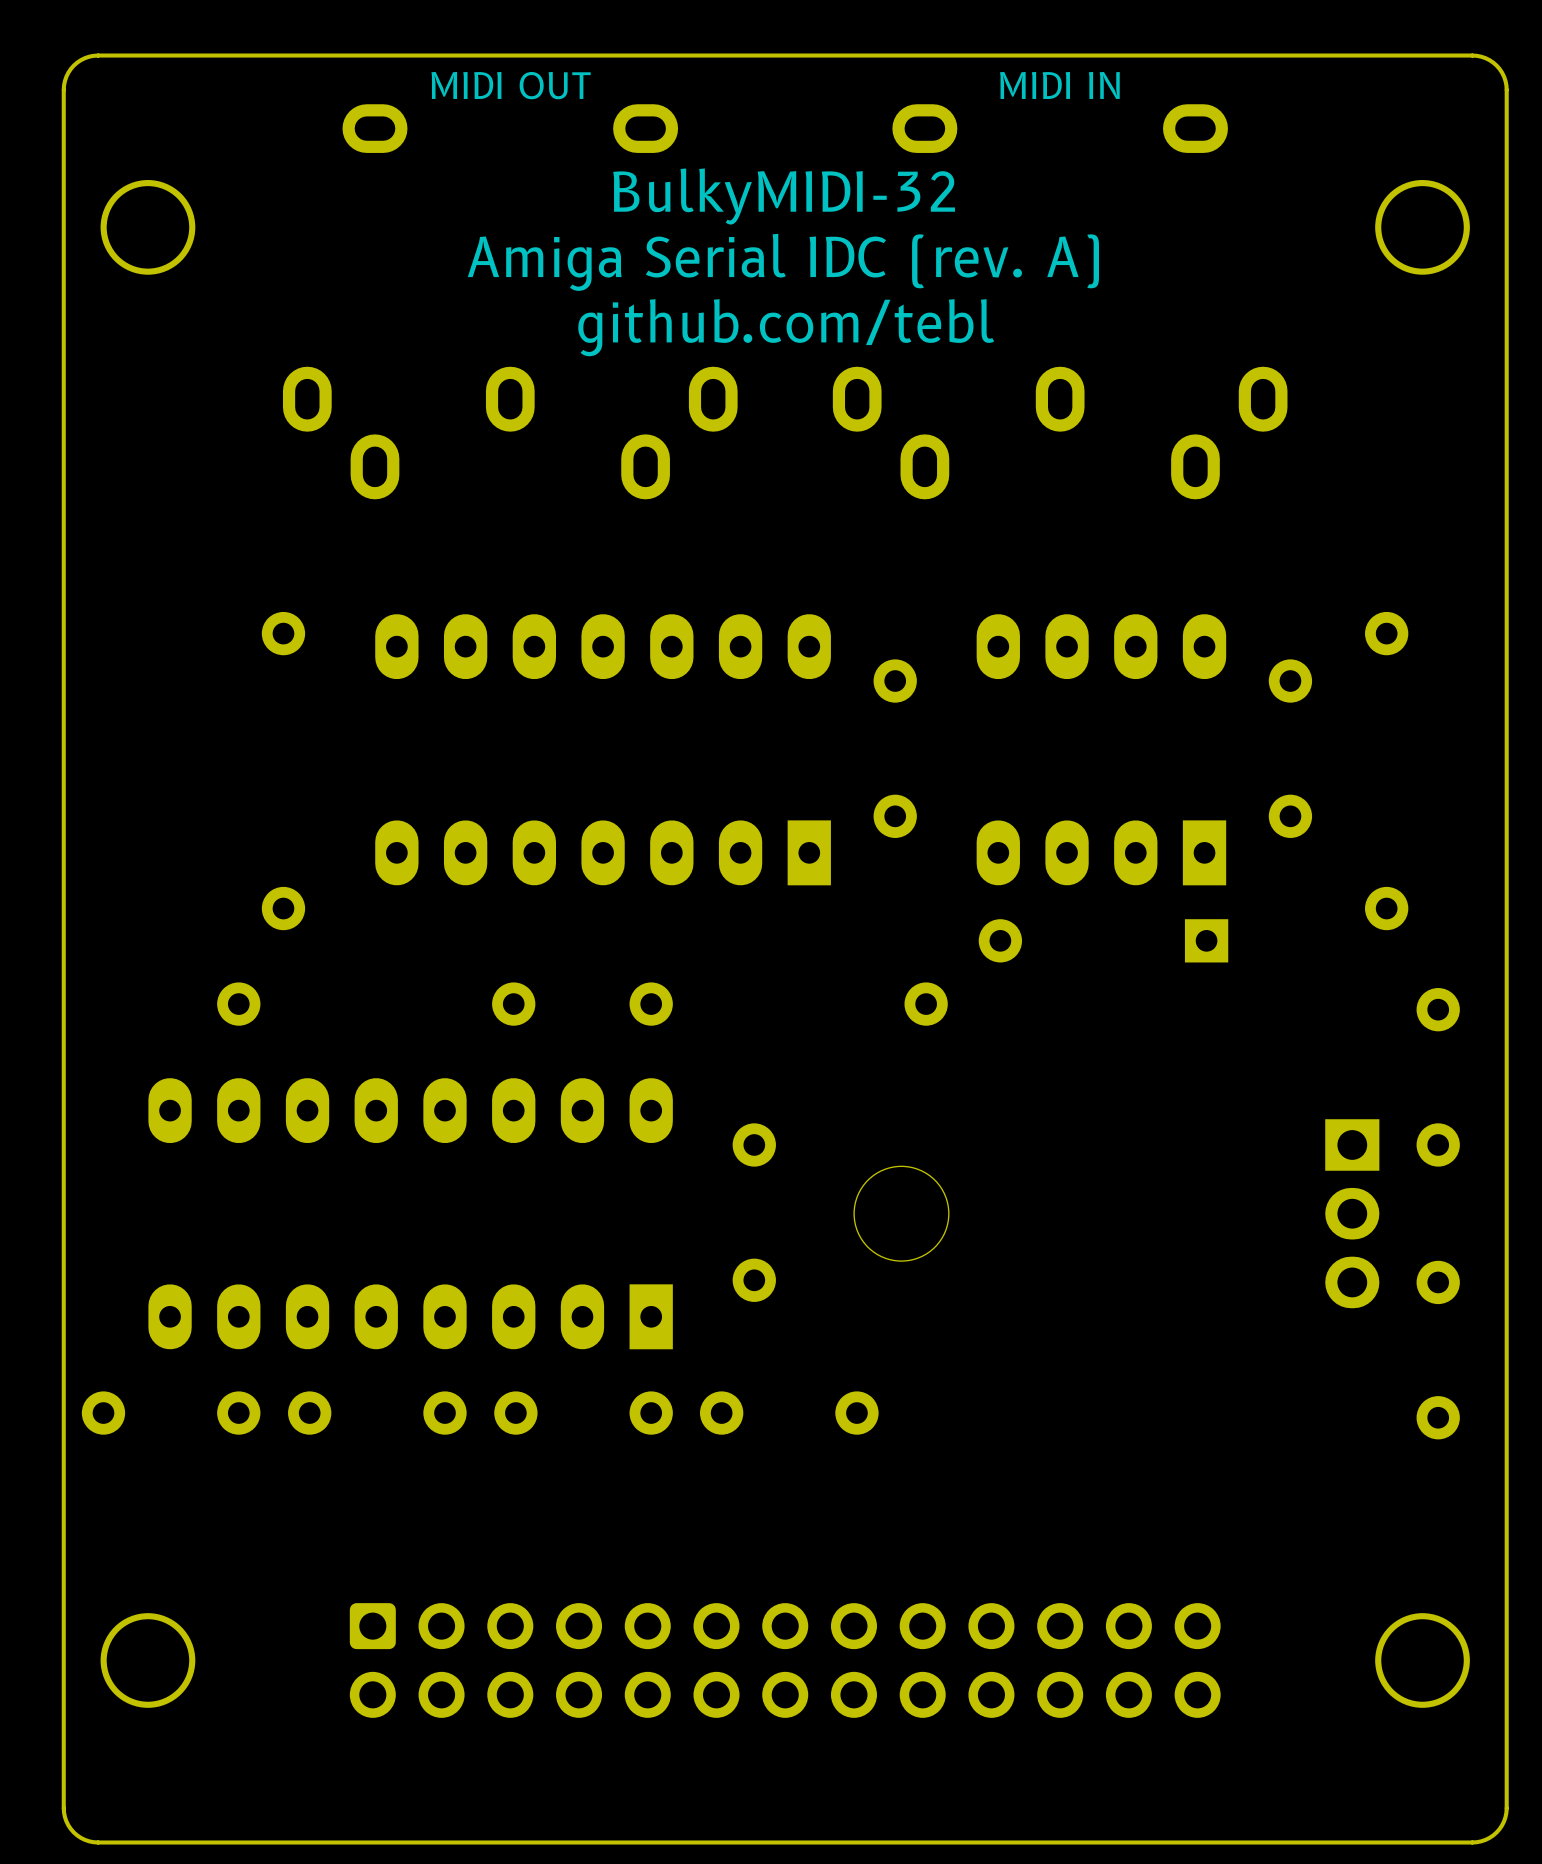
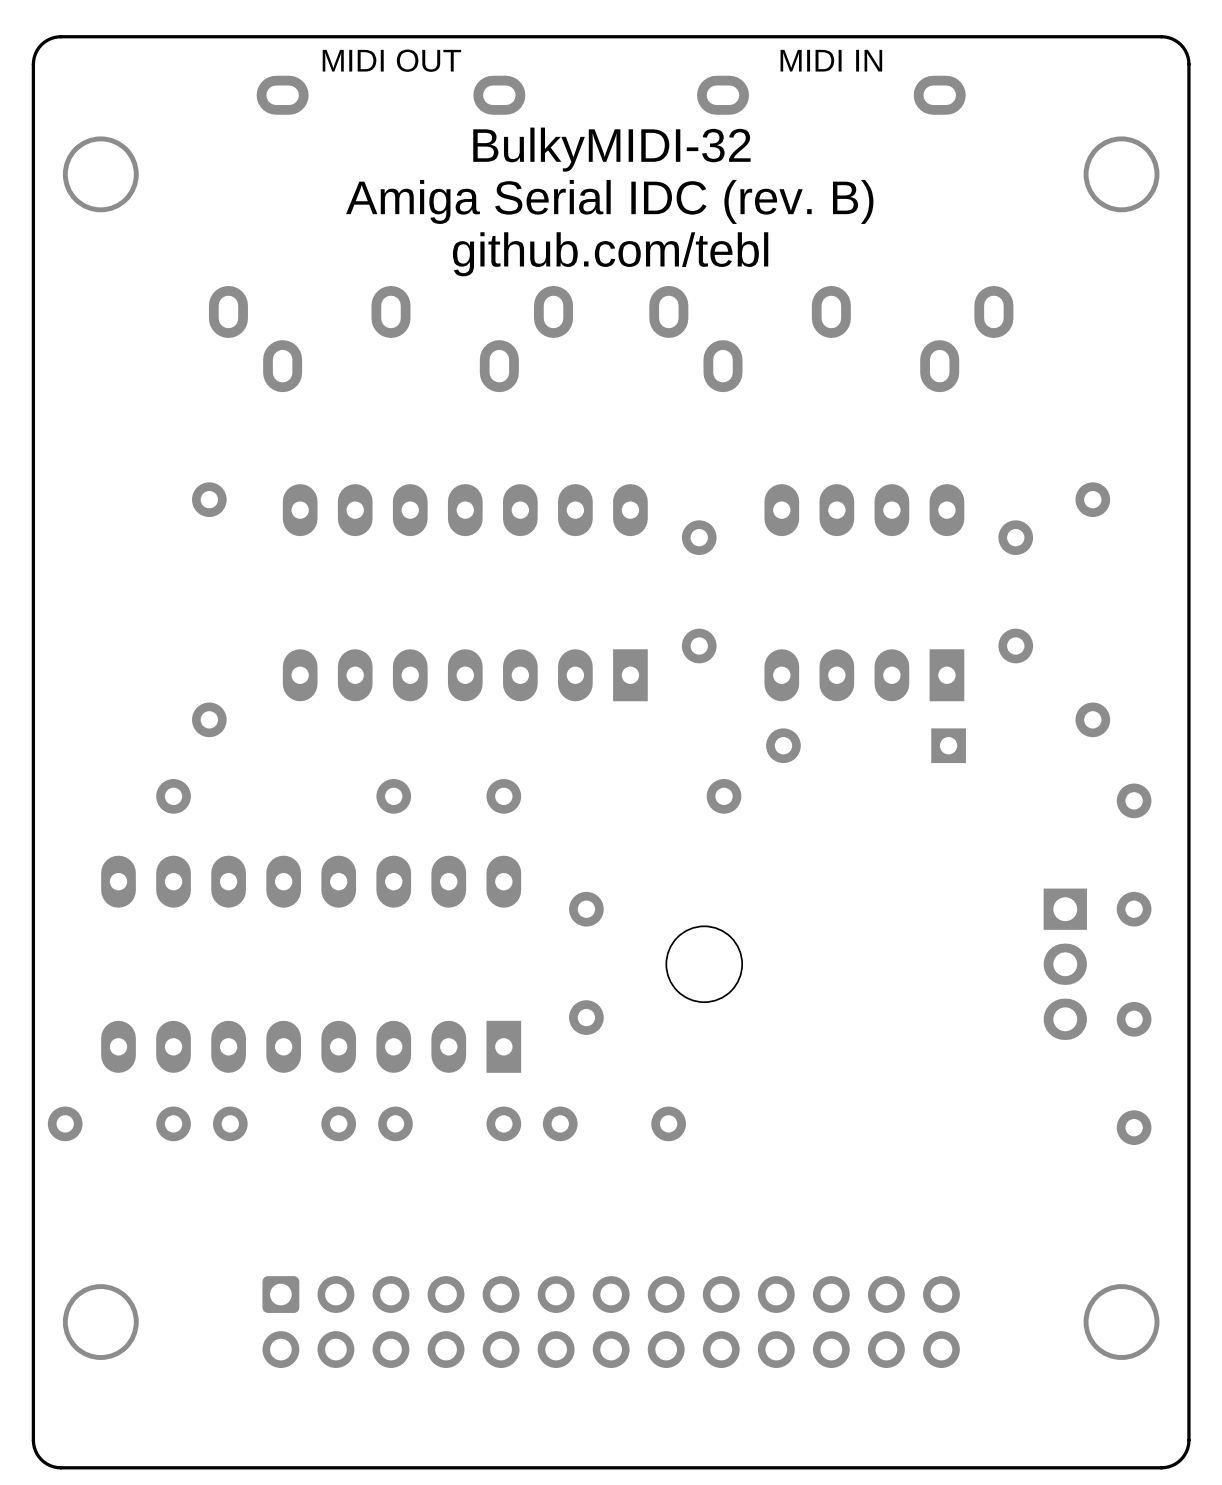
text: Amiga Serial IDC (rev. A) (783, 262) -> Amiga Serial IDC (rev. B) (609, 201)

